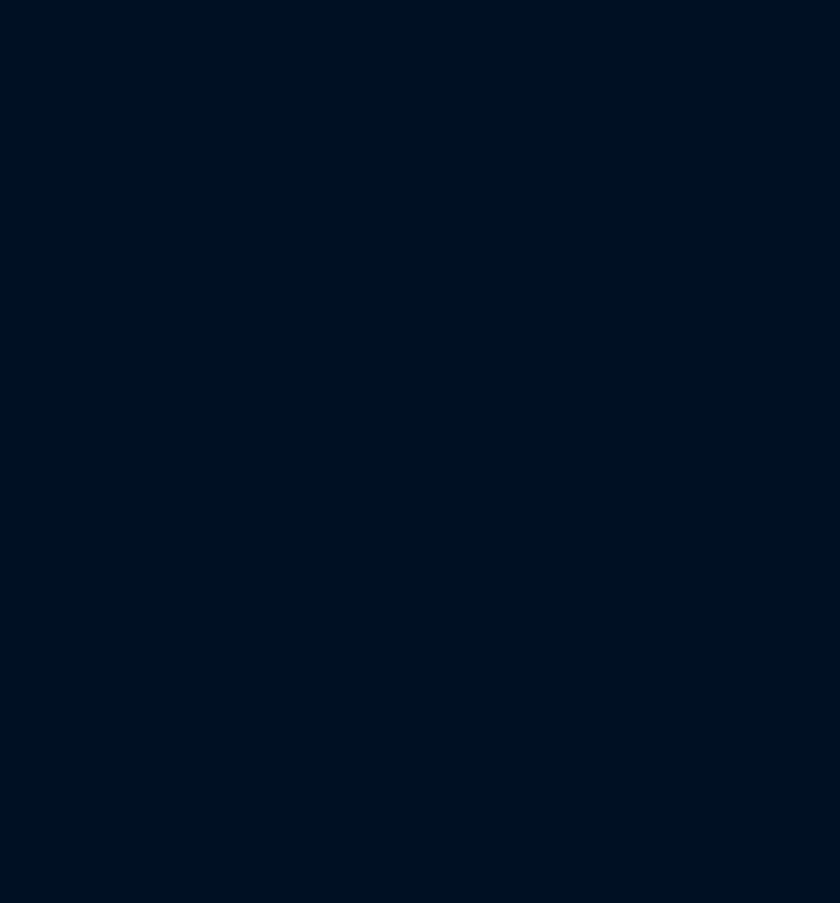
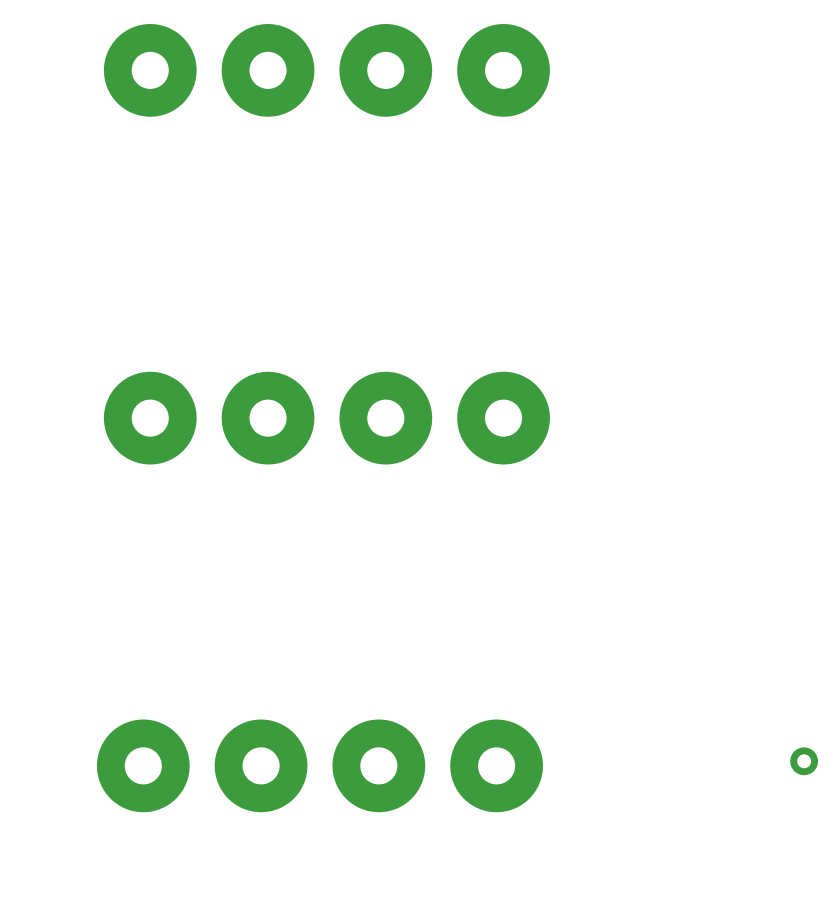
part: none -> (326, 70)
part: none -> (326, 418)
via: none -> (804, 761)
part: none -> (319, 765)

